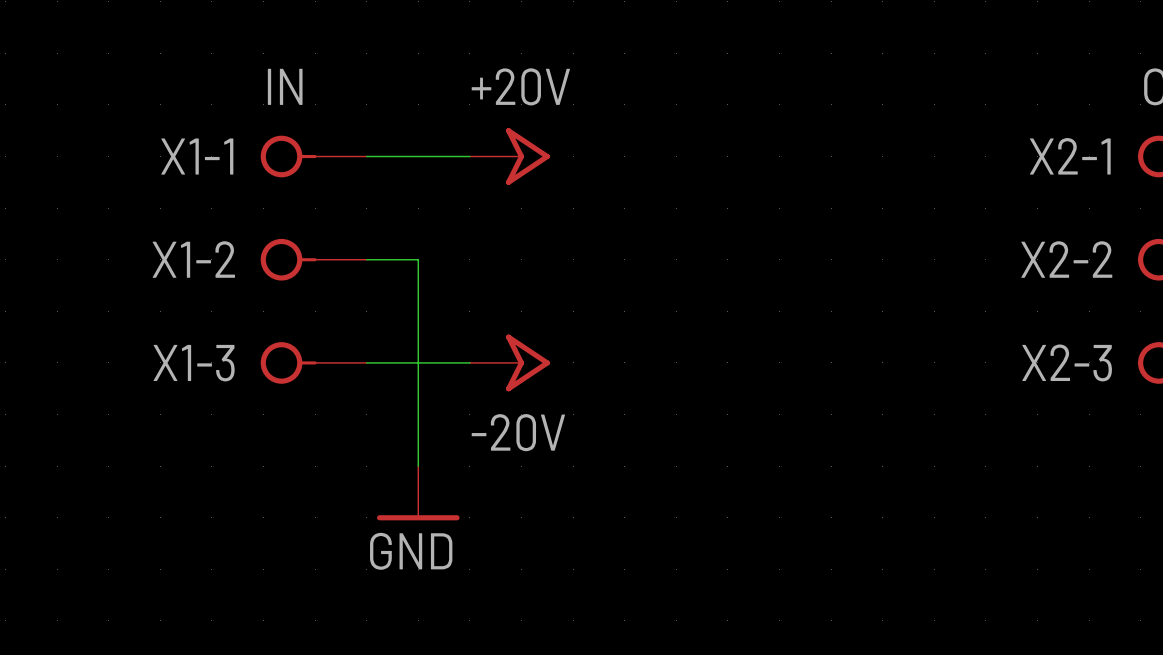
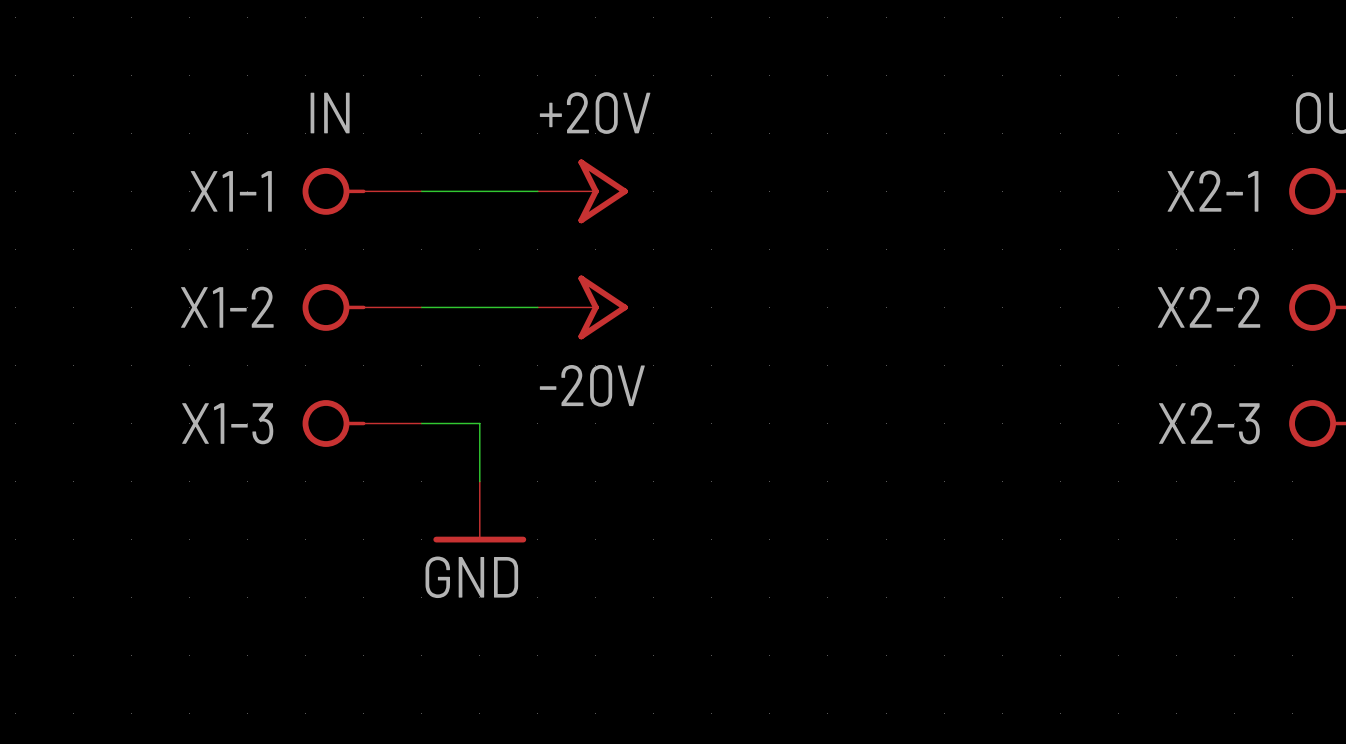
wire: (418, 259) (418, 362) (469, 362) -> (479, 307) (537, 307)
power symbol position: -20V (509, 362) -> -20V (582, 307)
power symbol position: GND (418, 493) -> GND (479, 512)

